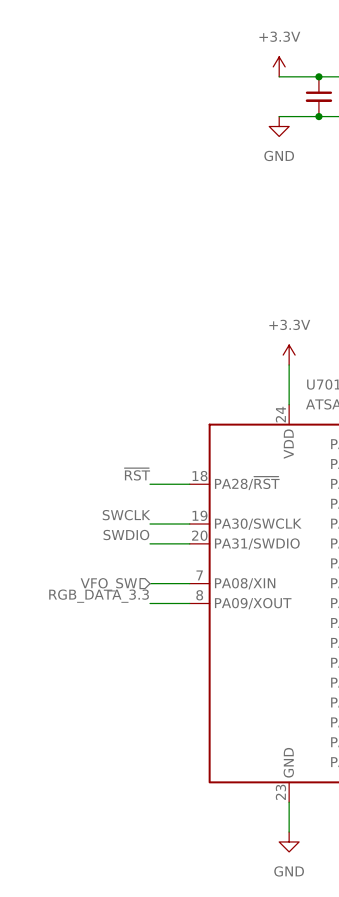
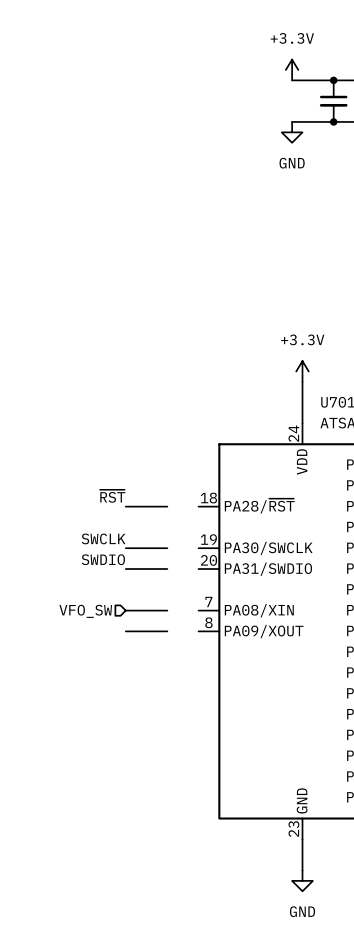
label position: ~{RST} (137, 474) -> ~{RST} (112, 496)
wire: (159, 484) (189, 484) -> (125, 506) (156, 506)
label position: SWCLK (126, 515) -> SWCLK (103, 538)
wire: (159, 524) (189, 524) -> (125, 548) (156, 548)
label position: SWDIO (126, 535) -> SWDIO (103, 559)
wire: (159, 543) (189, 543) -> (125, 569) (156, 569)
wire: (159, 583) (189, 583) -> (125, 610) (156, 610)
hierarchical label position: VFO_SW (108, 584) -> VFO_SW (85, 611)
label: RGB_DATA_3.3 (99, 596) -> none
wire: (159, 603) (189, 603) -> (125, 631) (156, 631)

